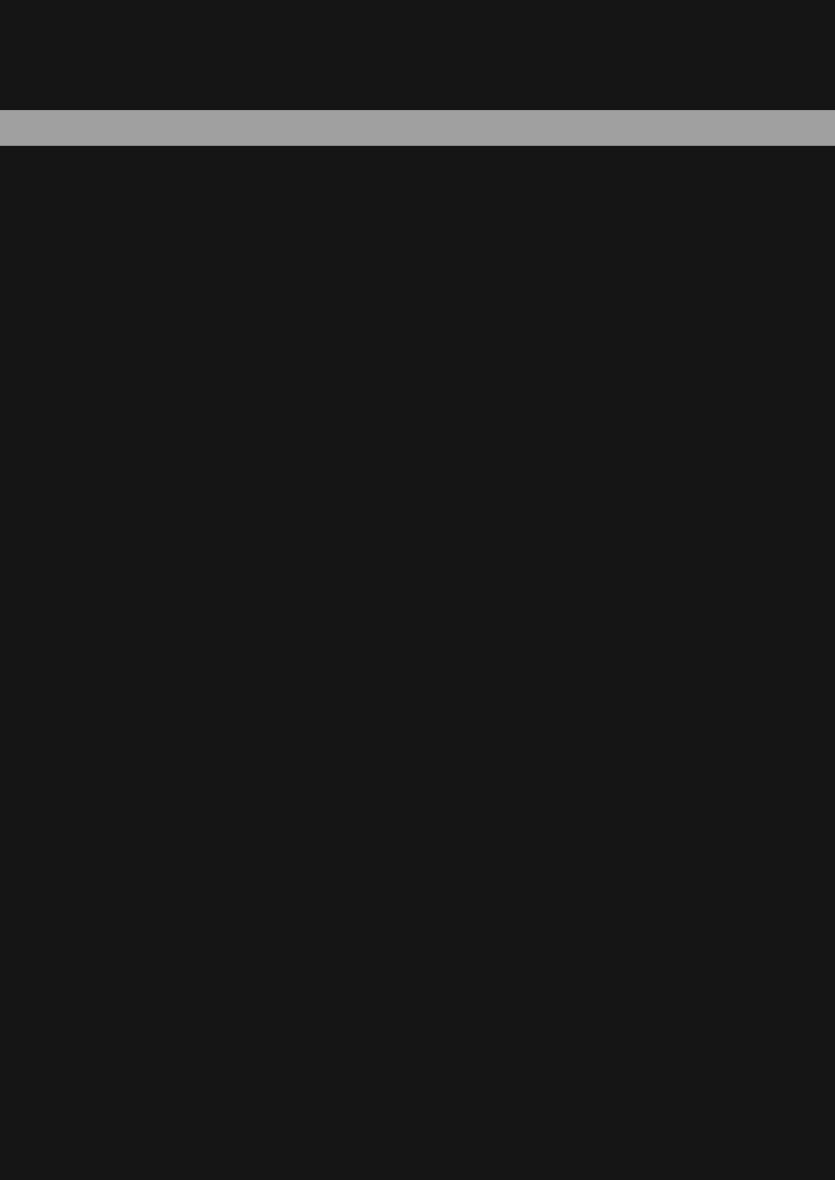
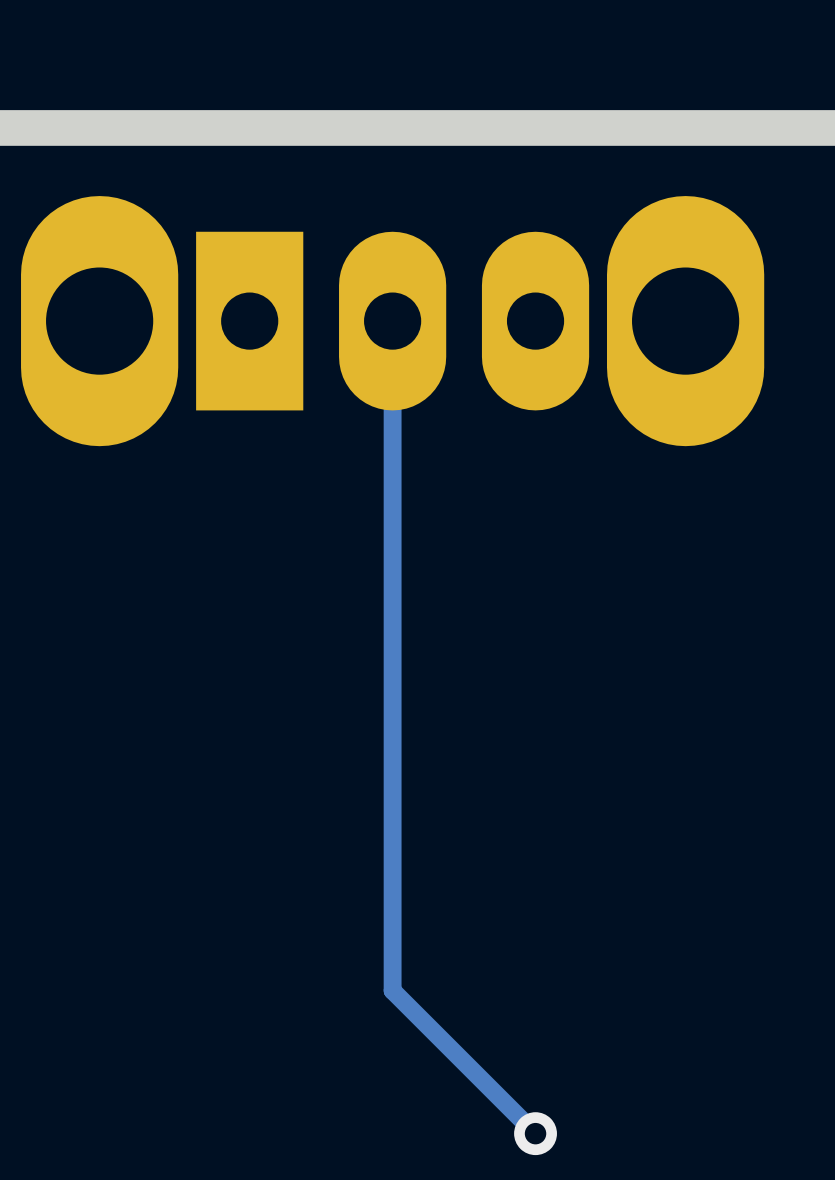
track: none -> (392, 321) (392, 990) (535, 1133)
part: none -> (392, 321)
via: none -> (535, 1133)

